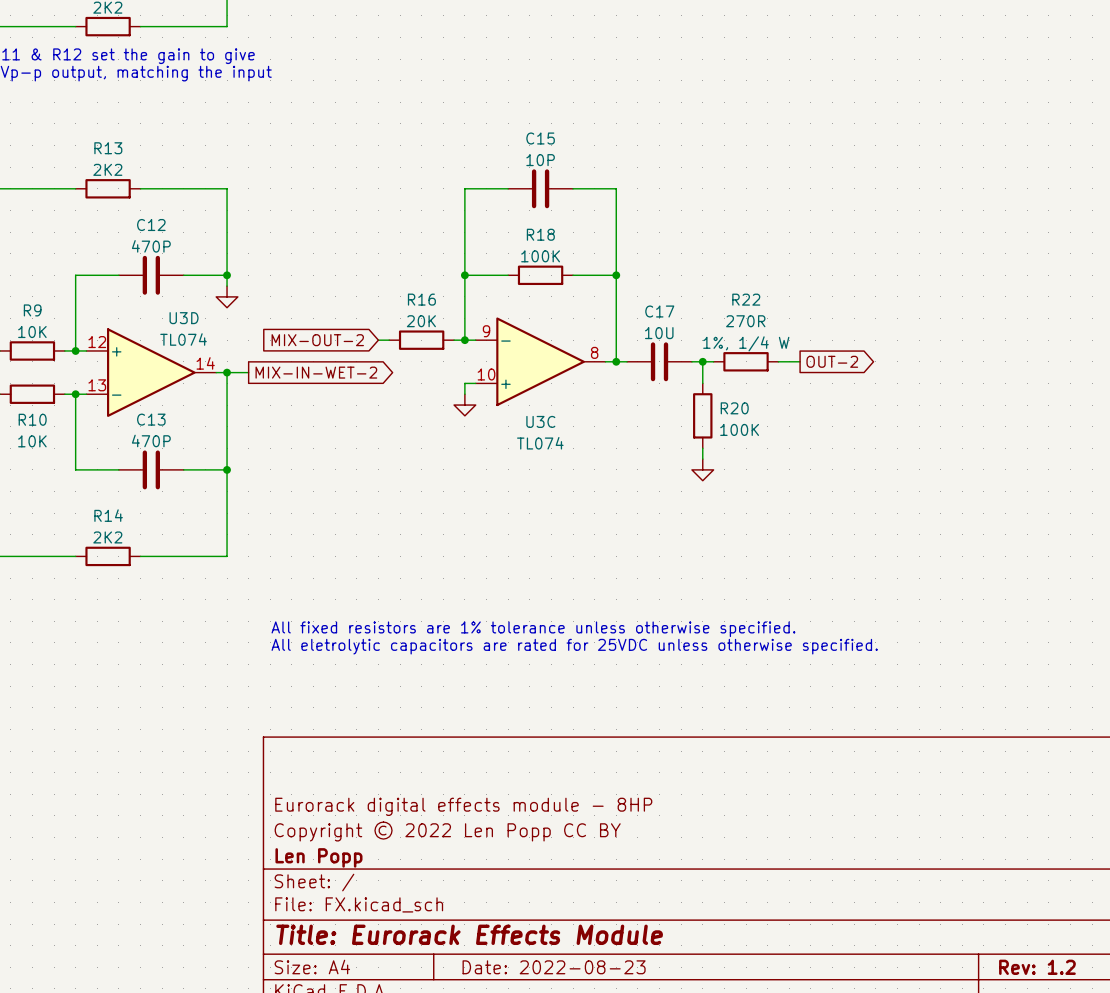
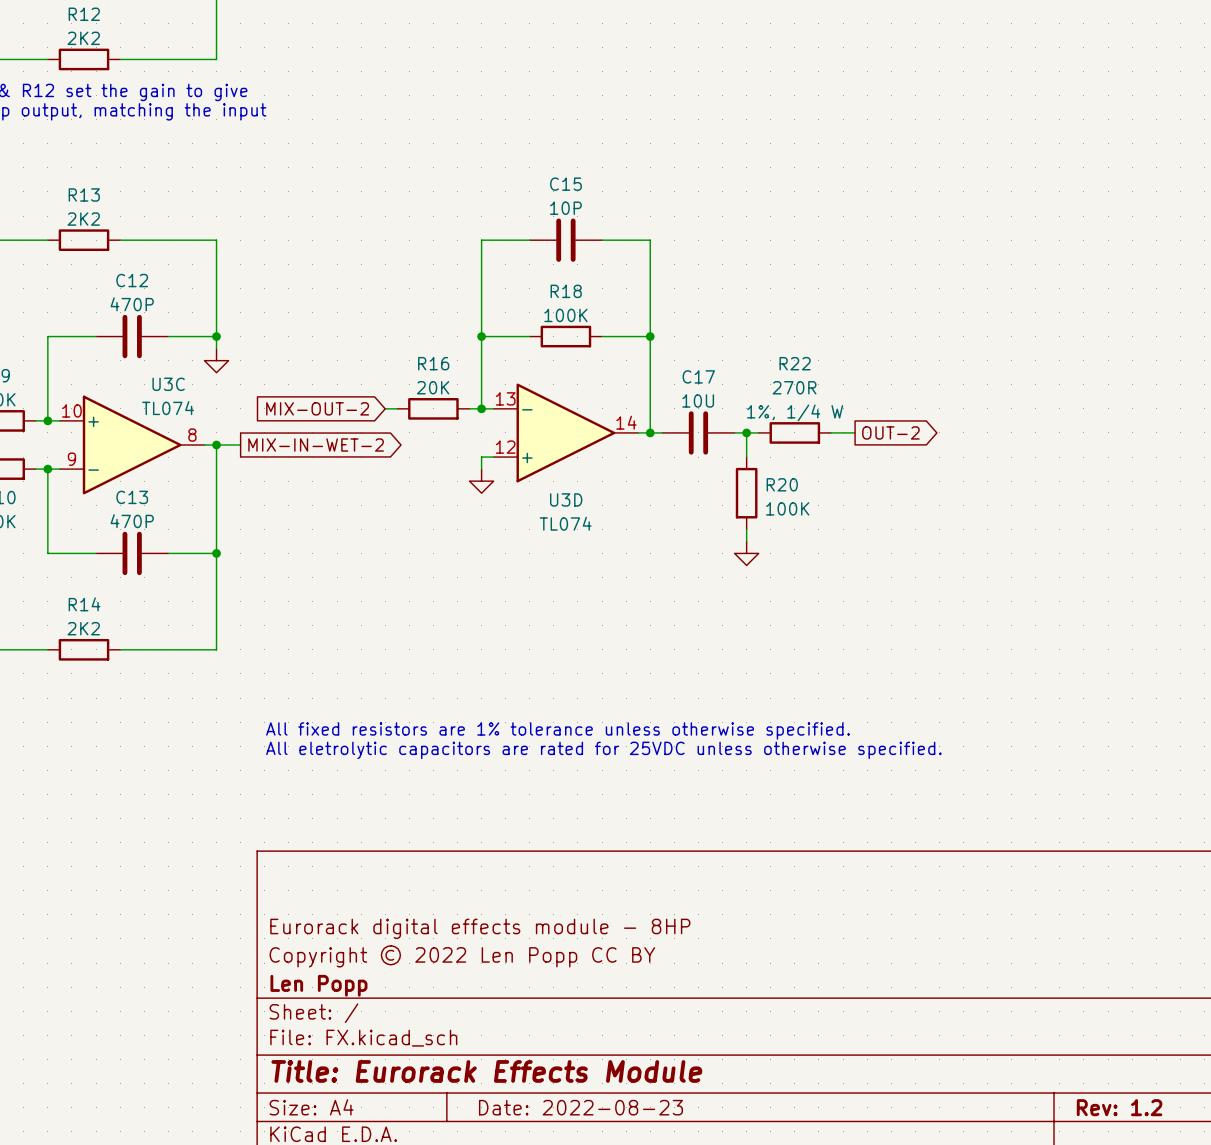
U3D name position: U3D (184, 318) -> U3D (566, 499)
U3C flip: as is (540, 361) -> up-down (132, 444)
U3C position: (540, 361) -> (132, 444)
U3D flip: as is (151, 372) -> up-down (565, 432)
U3D position: (151, 372) -> (565, 432)
U3C name position: U3C (540, 421) -> U3C (168, 384)

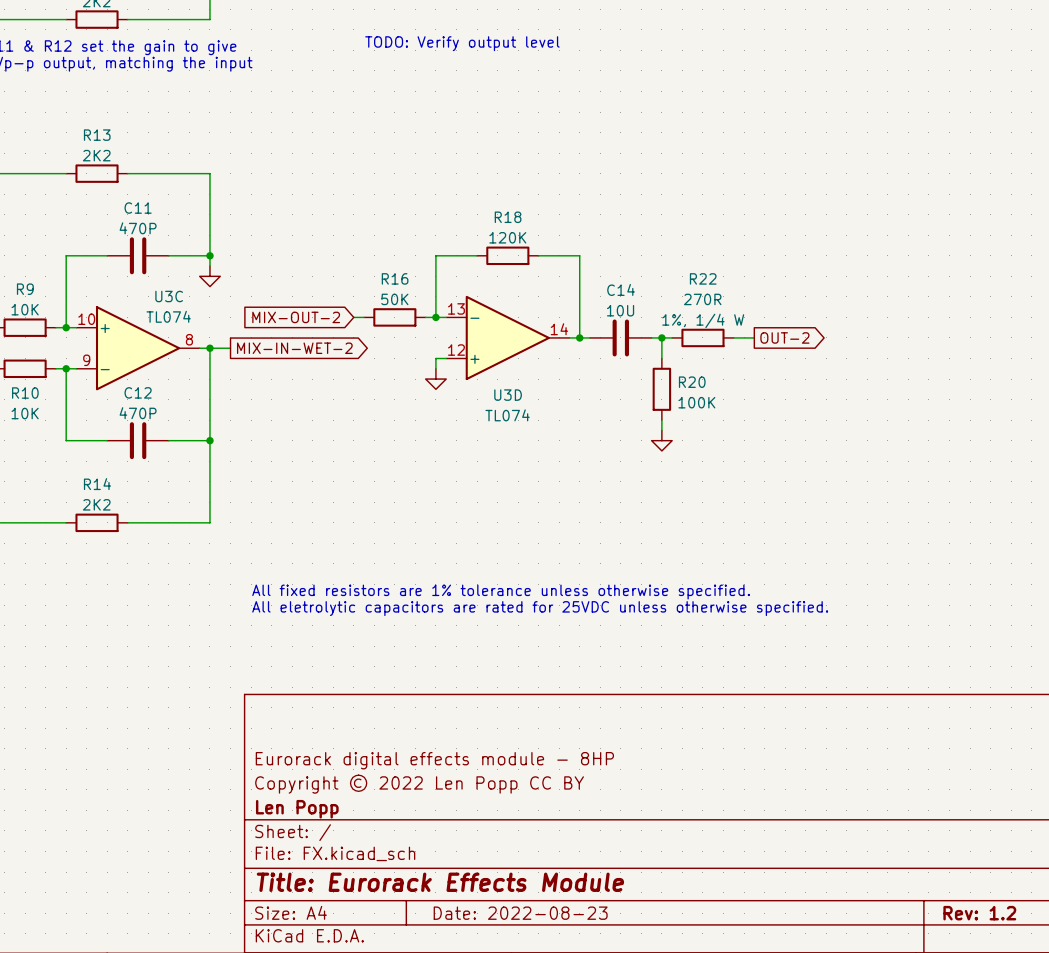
text: none -> TODO: Verify output level (462, 43)
wire: (529, 240) (481, 240) (481, 336) -> none
C15: 10P (565, 240) -> none
wire: (602, 240) (650, 240) (650, 336) -> none
C12 name: C12 (132, 280) -> C11 (138, 208)
R18 value: 100K (565, 315) -> 120K (507, 237)
junction: (481, 336) -> none
junction: (650, 336) -> none
C17 name: C17 (698, 376) -> C14 (621, 289)
R16 value: 20K (433, 387) -> 50K (394, 299)
C13 name: C13 (132, 497) -> C12 (138, 392)

